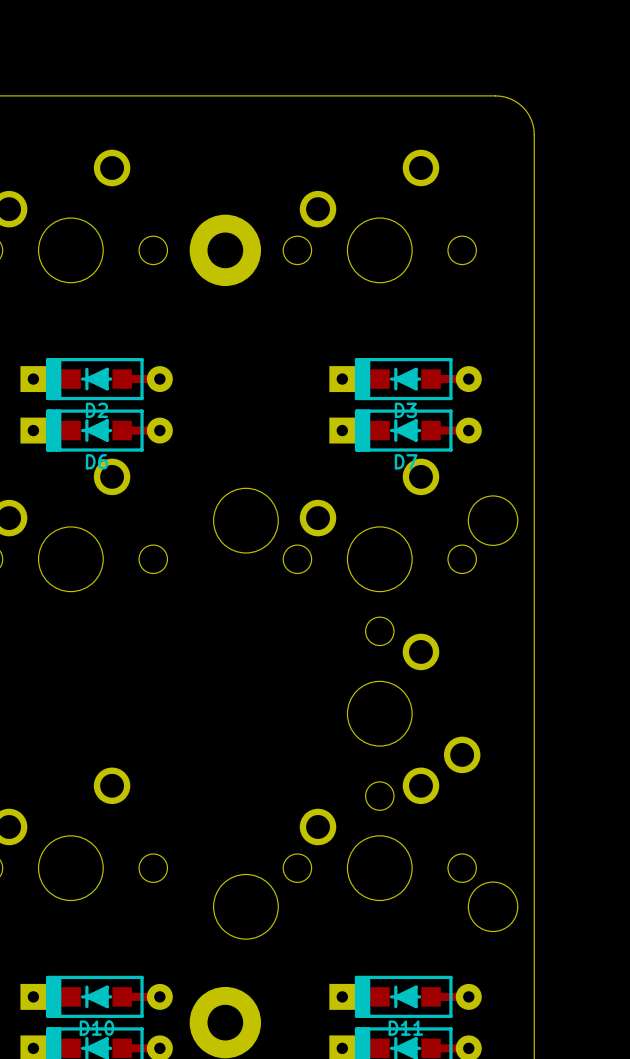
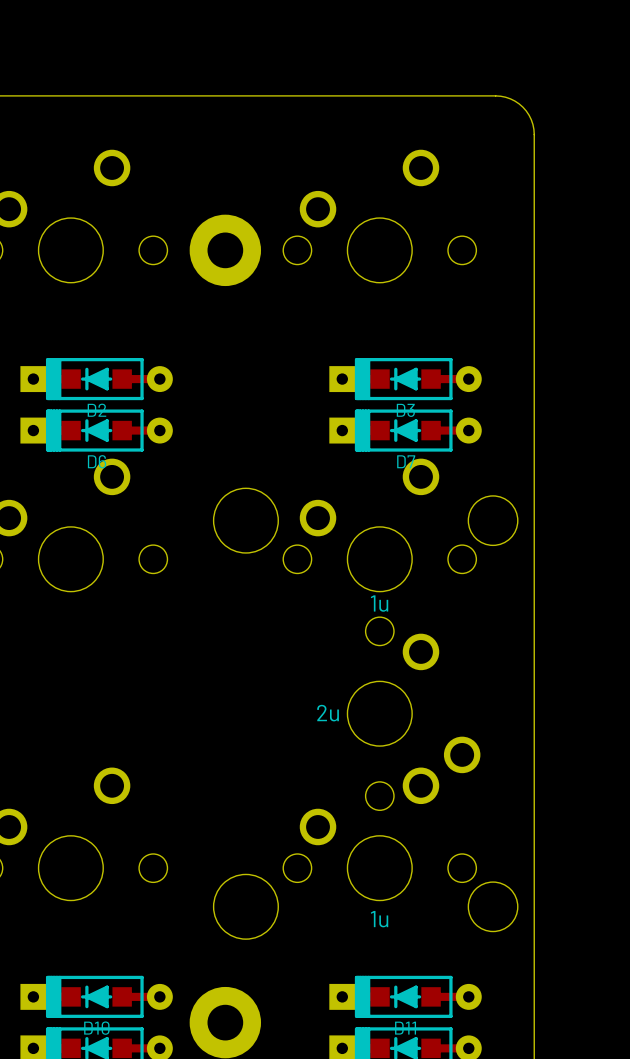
text: none -> 1u (379, 603)
text: none -> 2u (328, 713)
text: none -> 1u (379, 919)

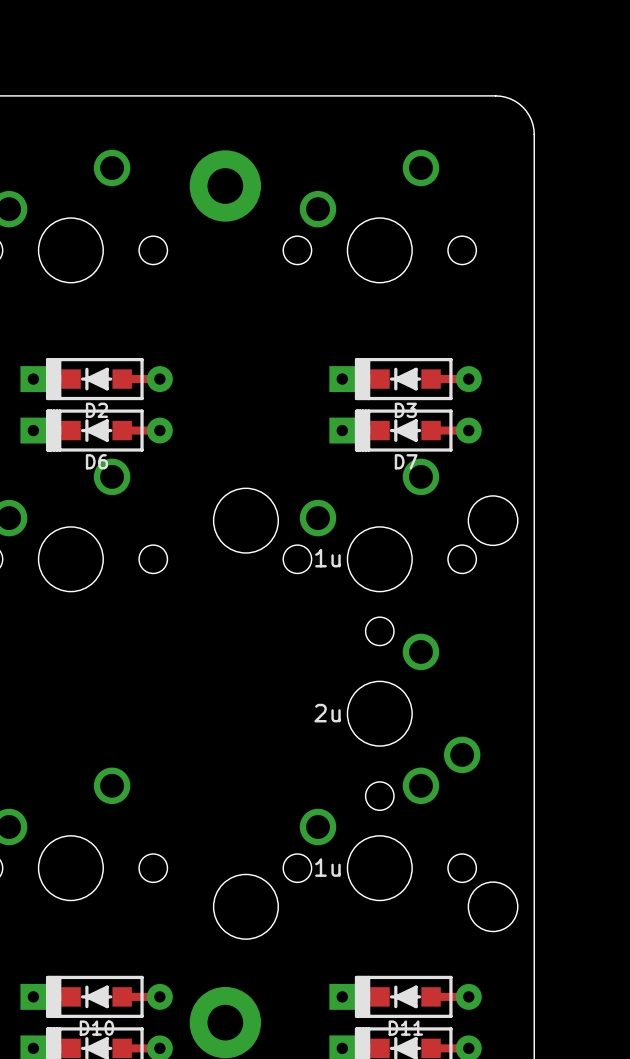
part position: (225, 250) -> (225, 186)
text position: 1u (379, 603) -> 1u (327, 558)
text position: 1u (379, 919) -> 1u (327, 867)

